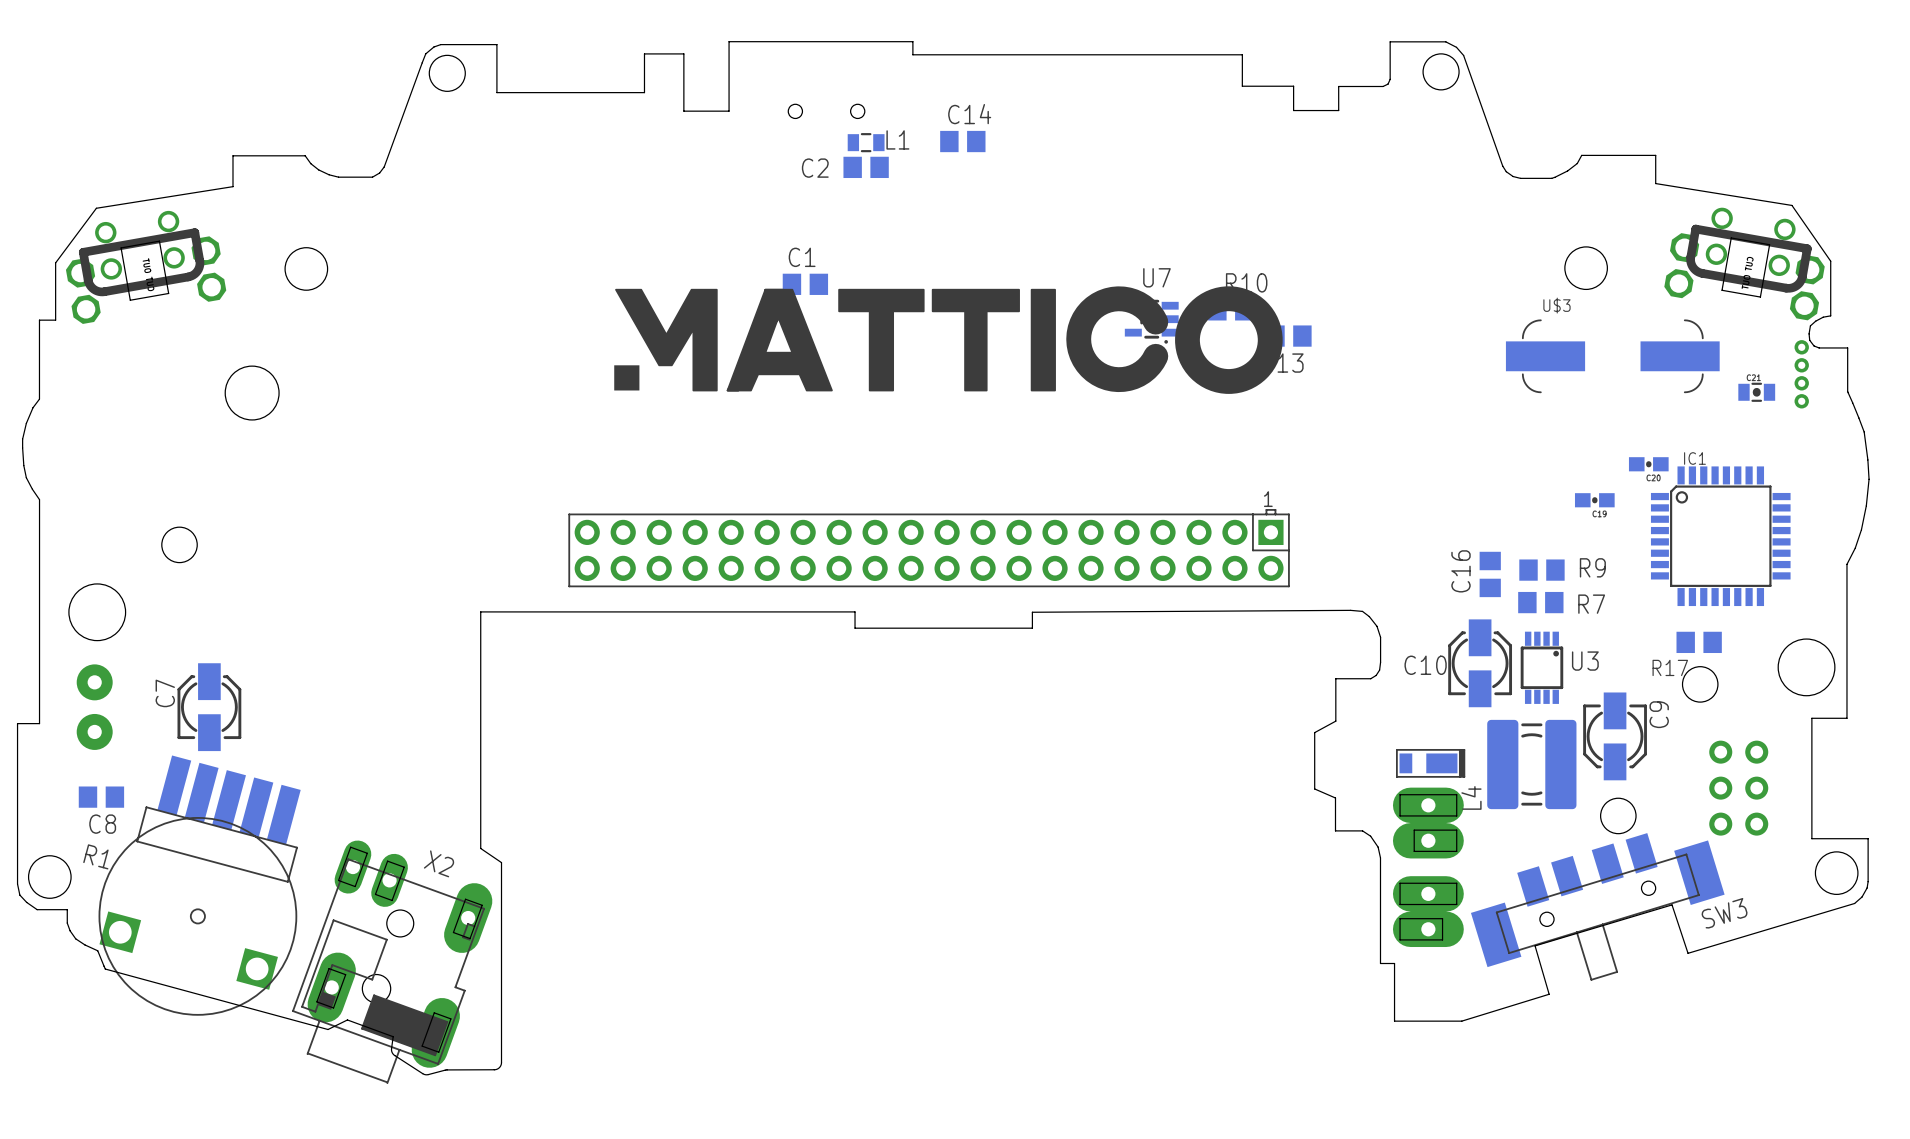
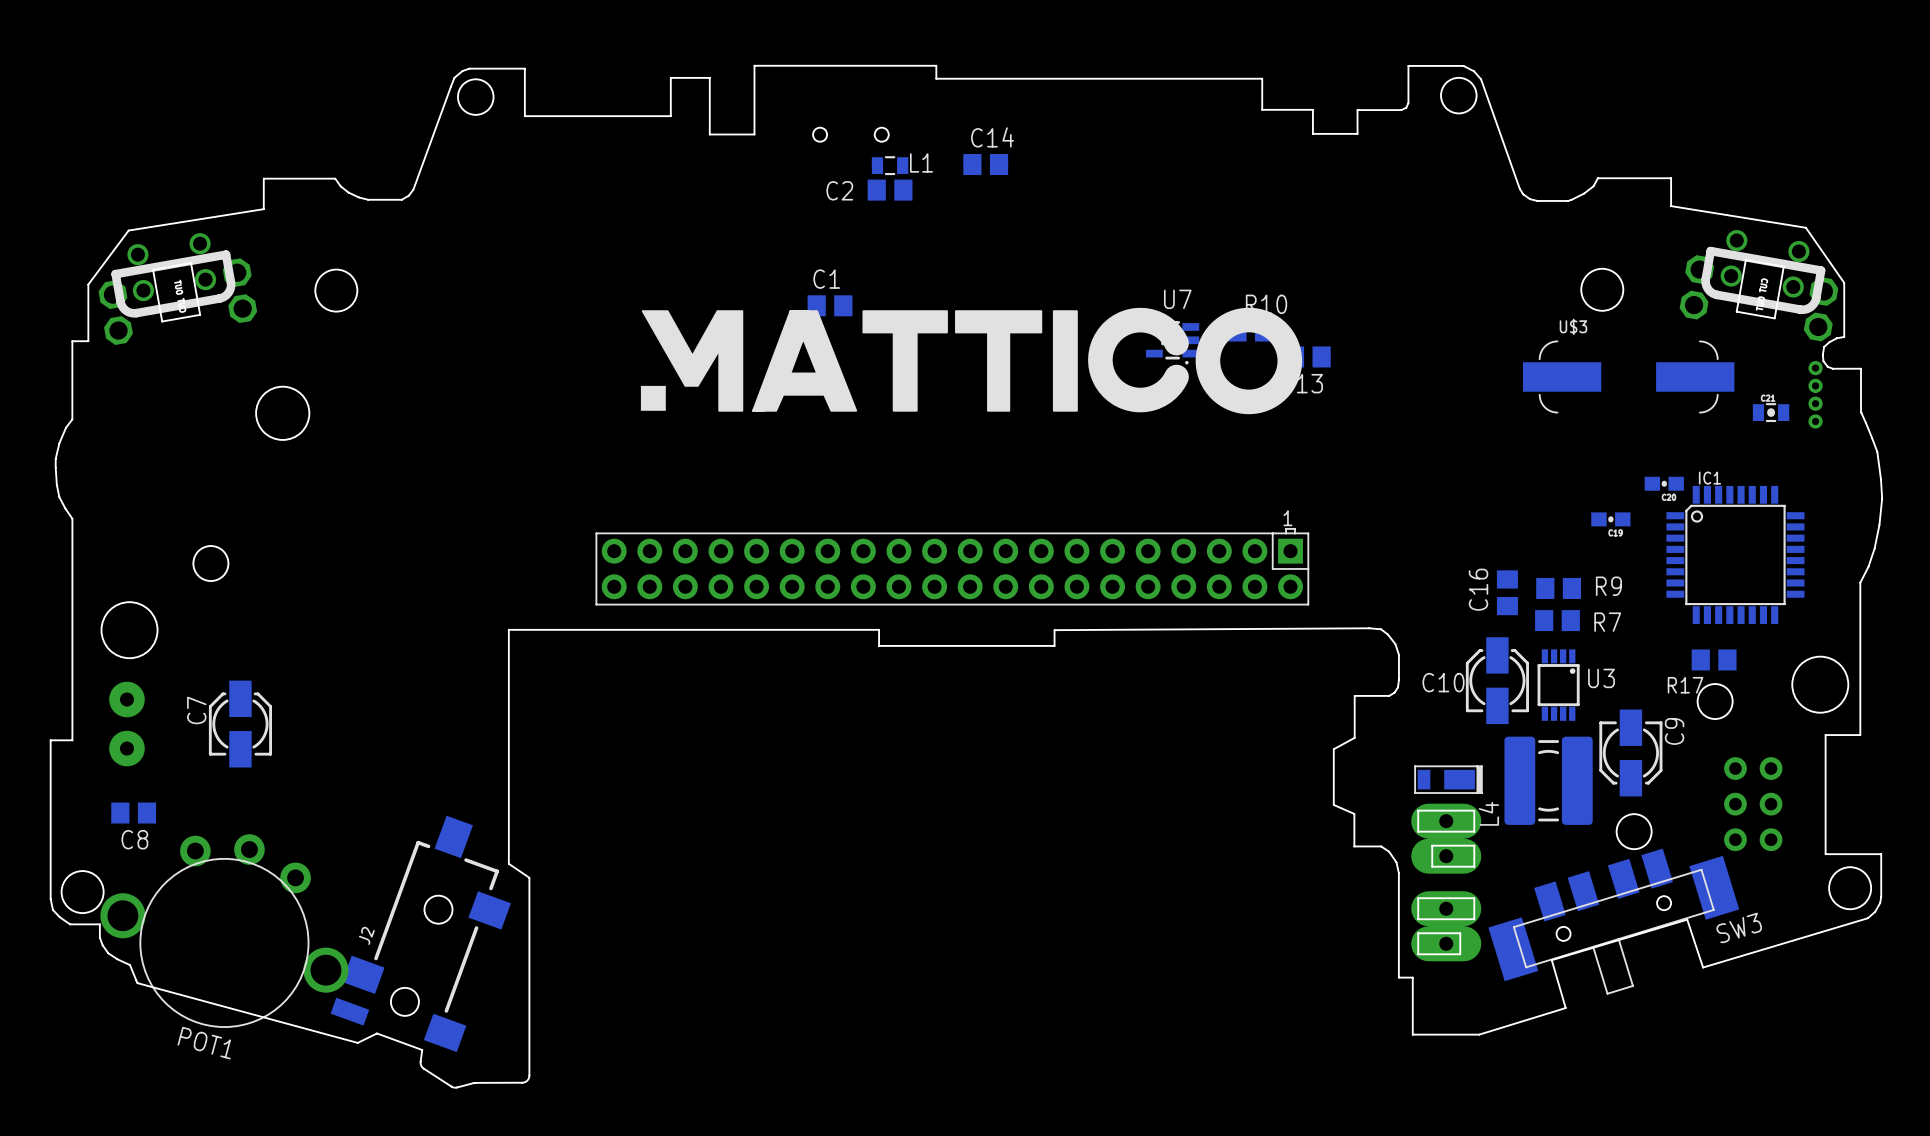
R1: (199, 885) -> none
POT1: none -> (224, 931)
J2: none -> (420, 933)
X2: (392, 962) -> none

